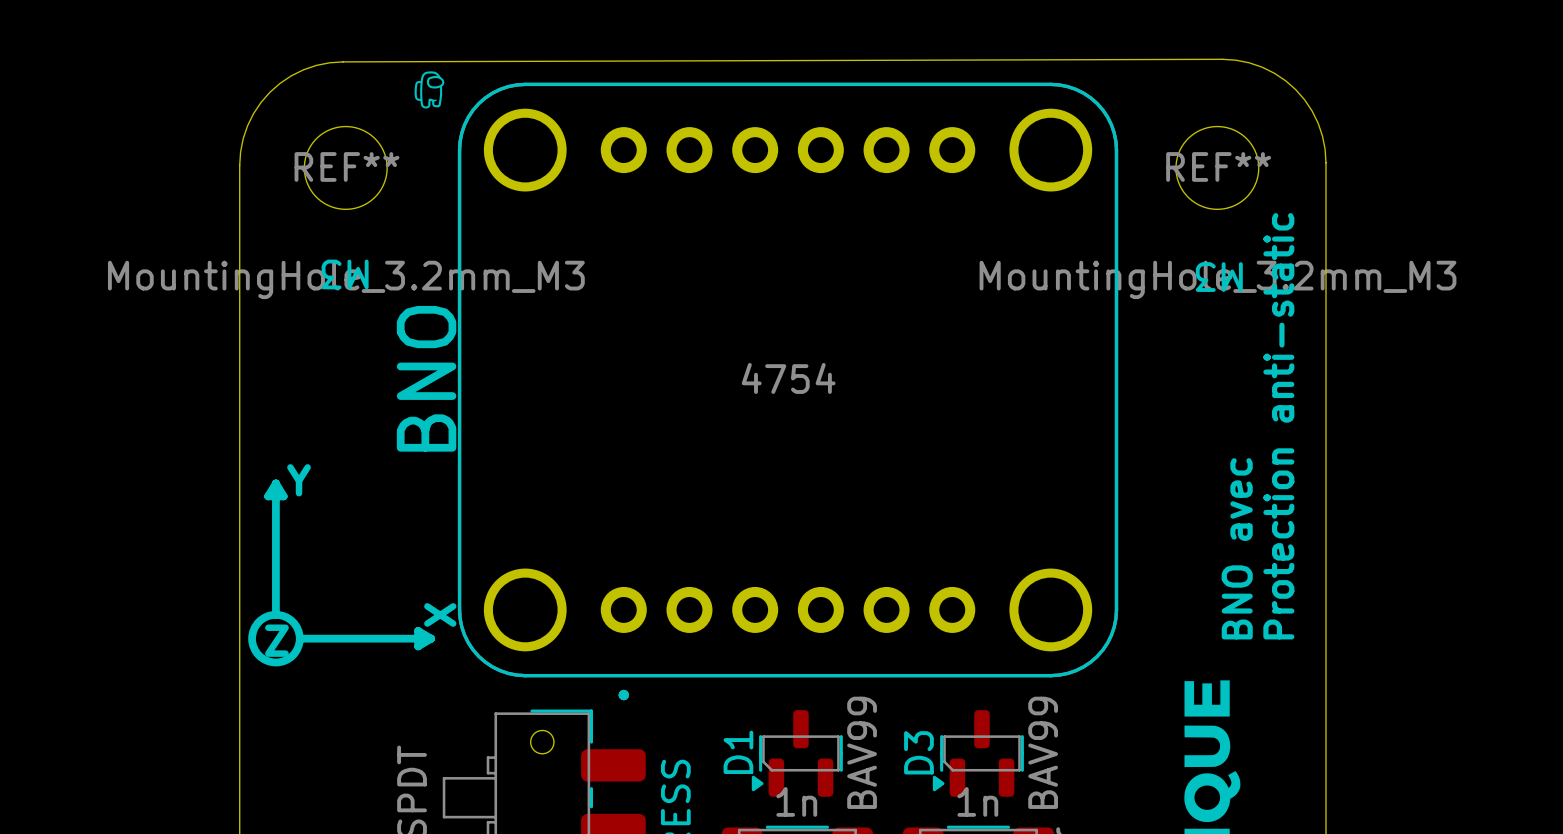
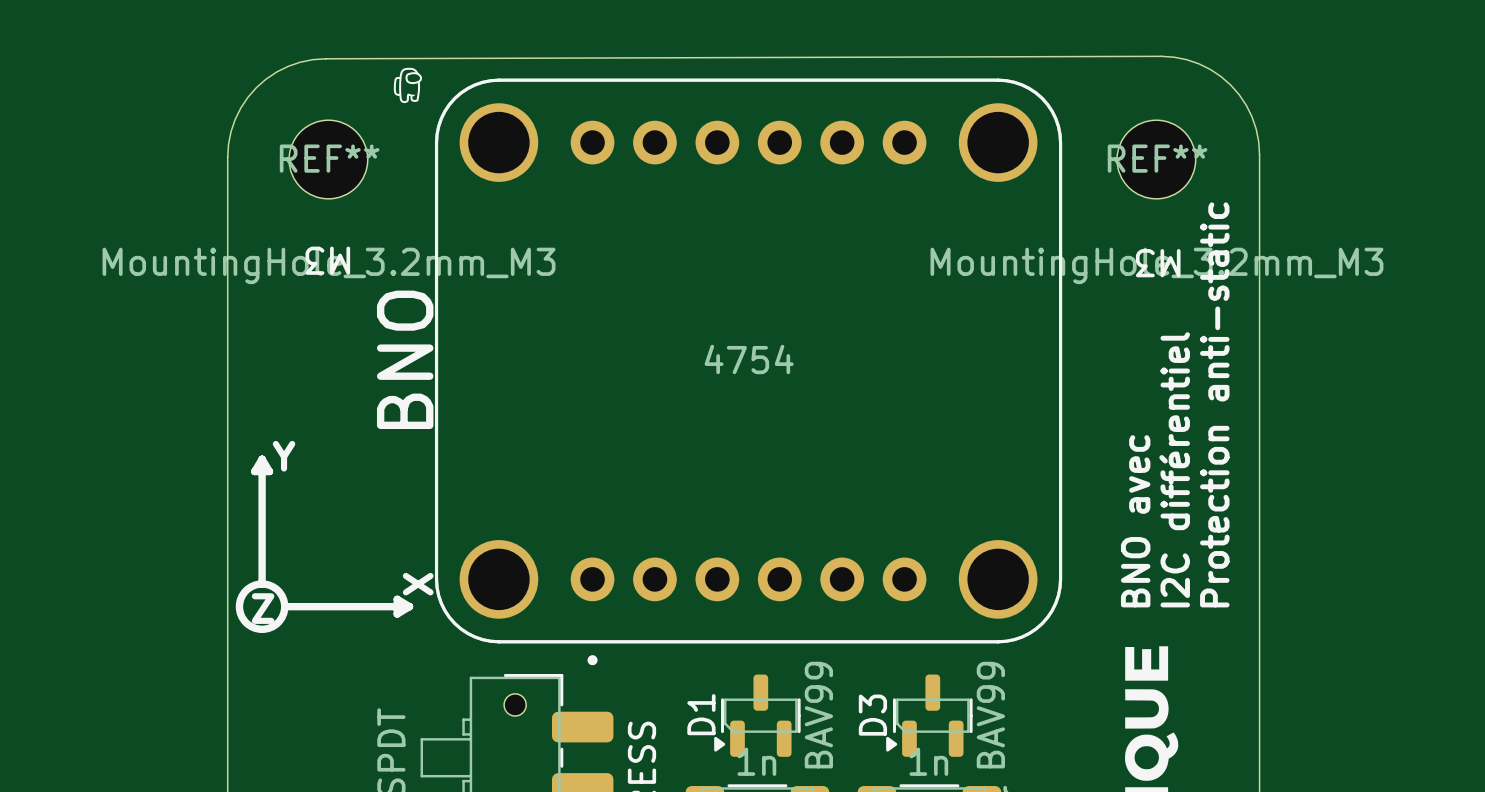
text: none -> BNO avec (1135, 521)
text: BNO avec (1237, 548) -> I2C différentiel (1174, 469)

